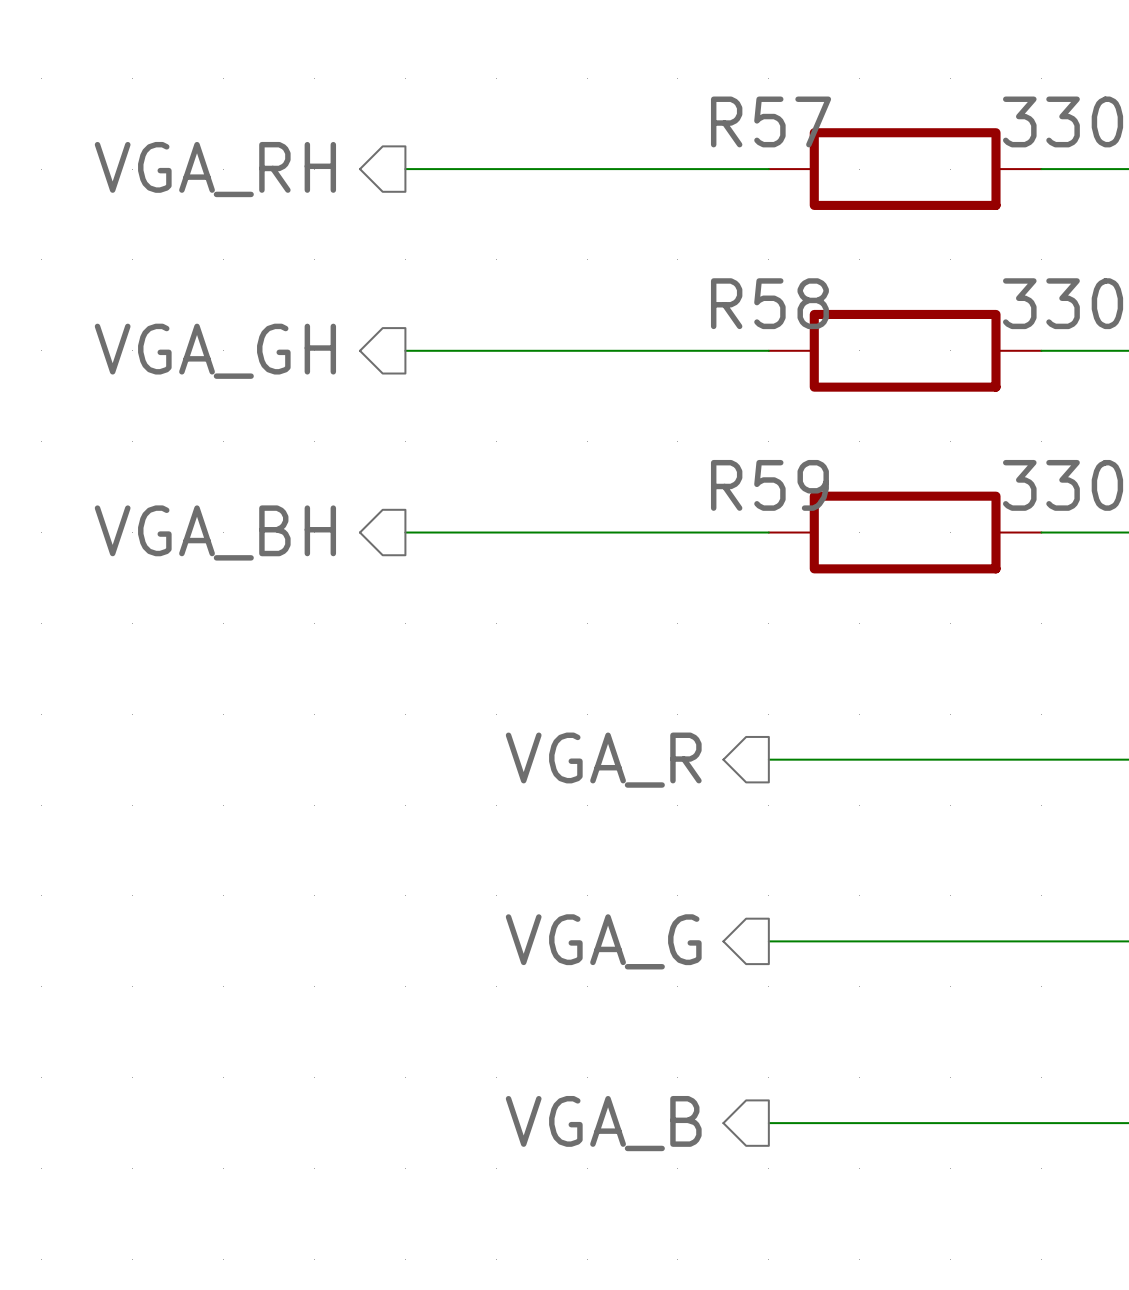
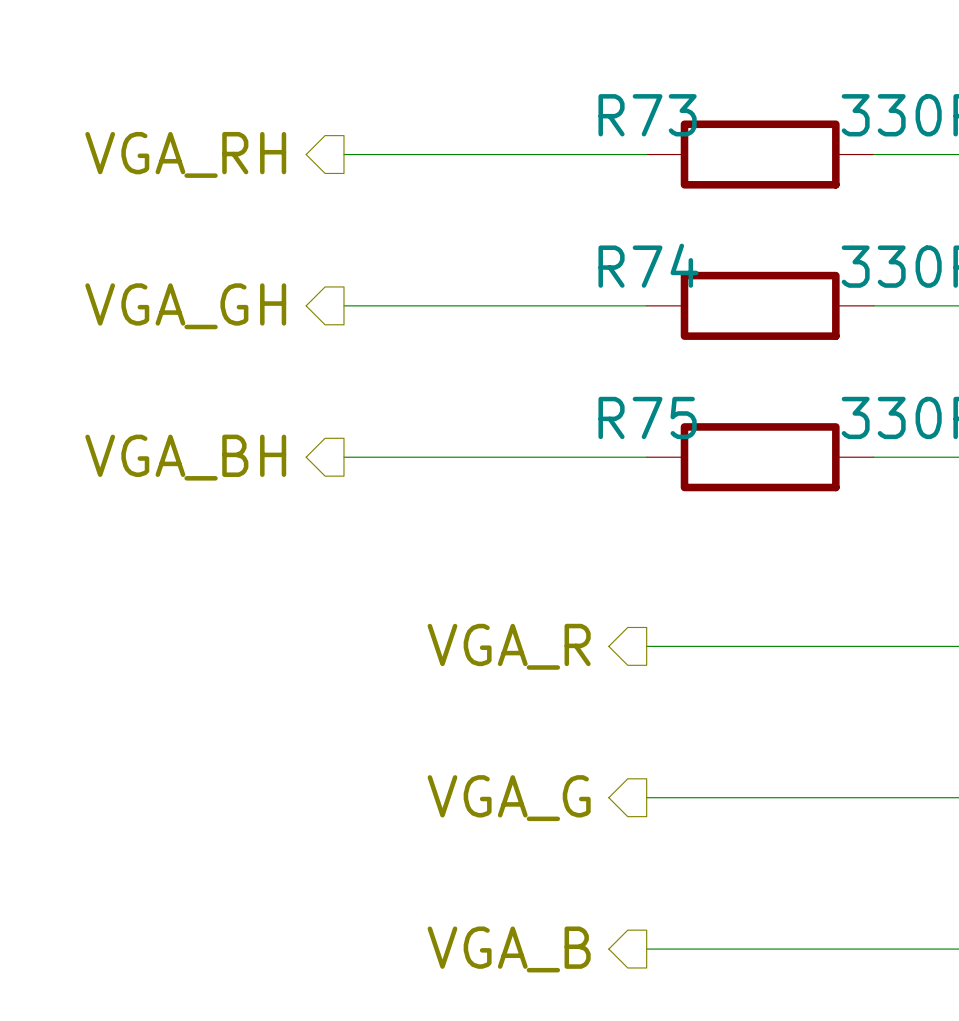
R57 name: R57 (771, 121) -> R73 (647, 115)
R58 name: R58 (769, 303) -> R74 (648, 265)
R59 name: R59 (769, 485) -> R75 (647, 417)

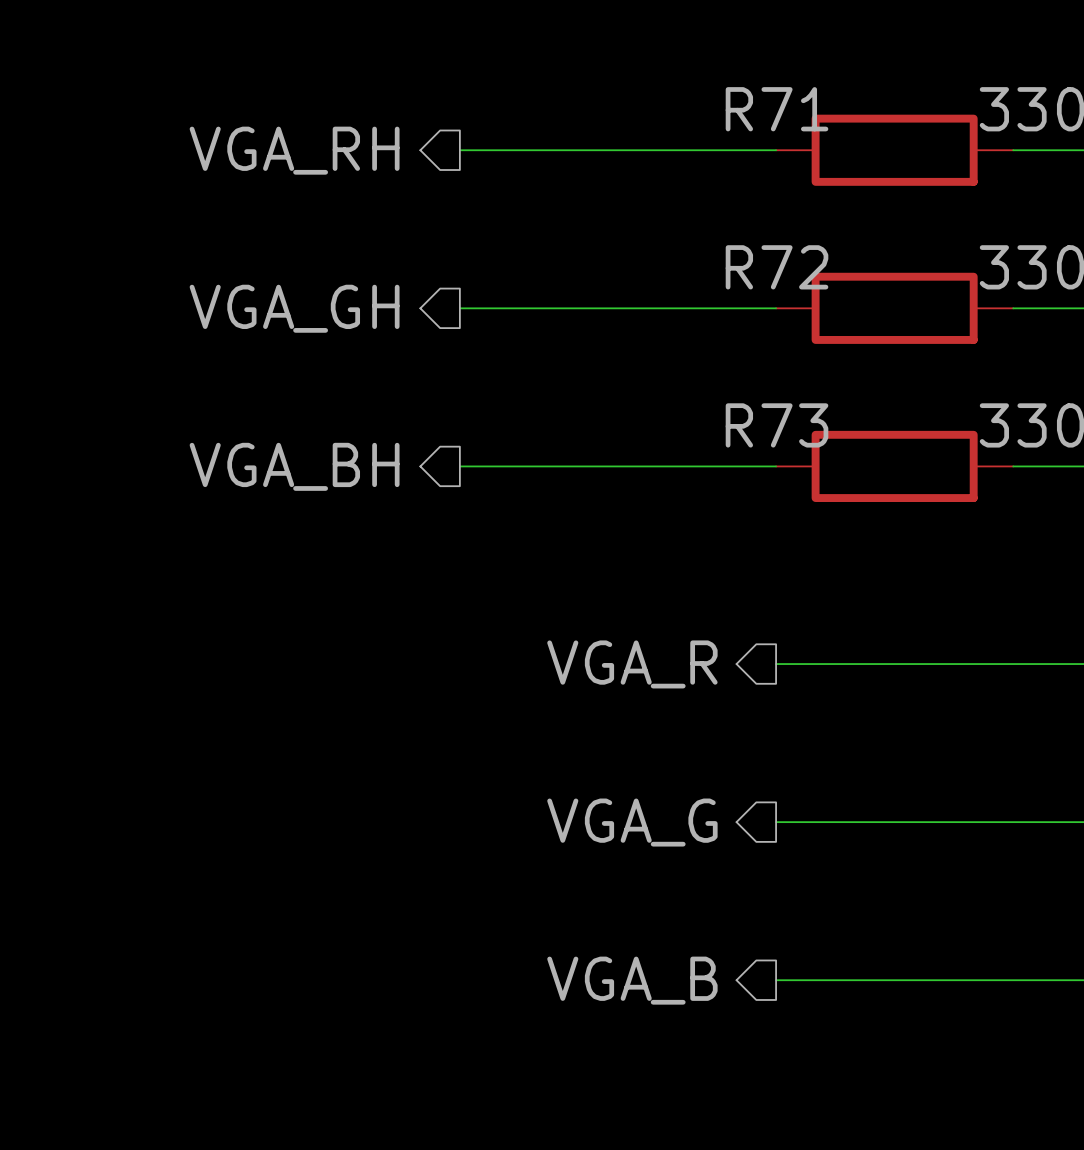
R73 name: R73 (647, 115) -> R71 (777, 109)
R74 name: R74 (648, 265) -> R72 (777, 267)
R75 name: R75 (647, 417) -> R73 (777, 425)

